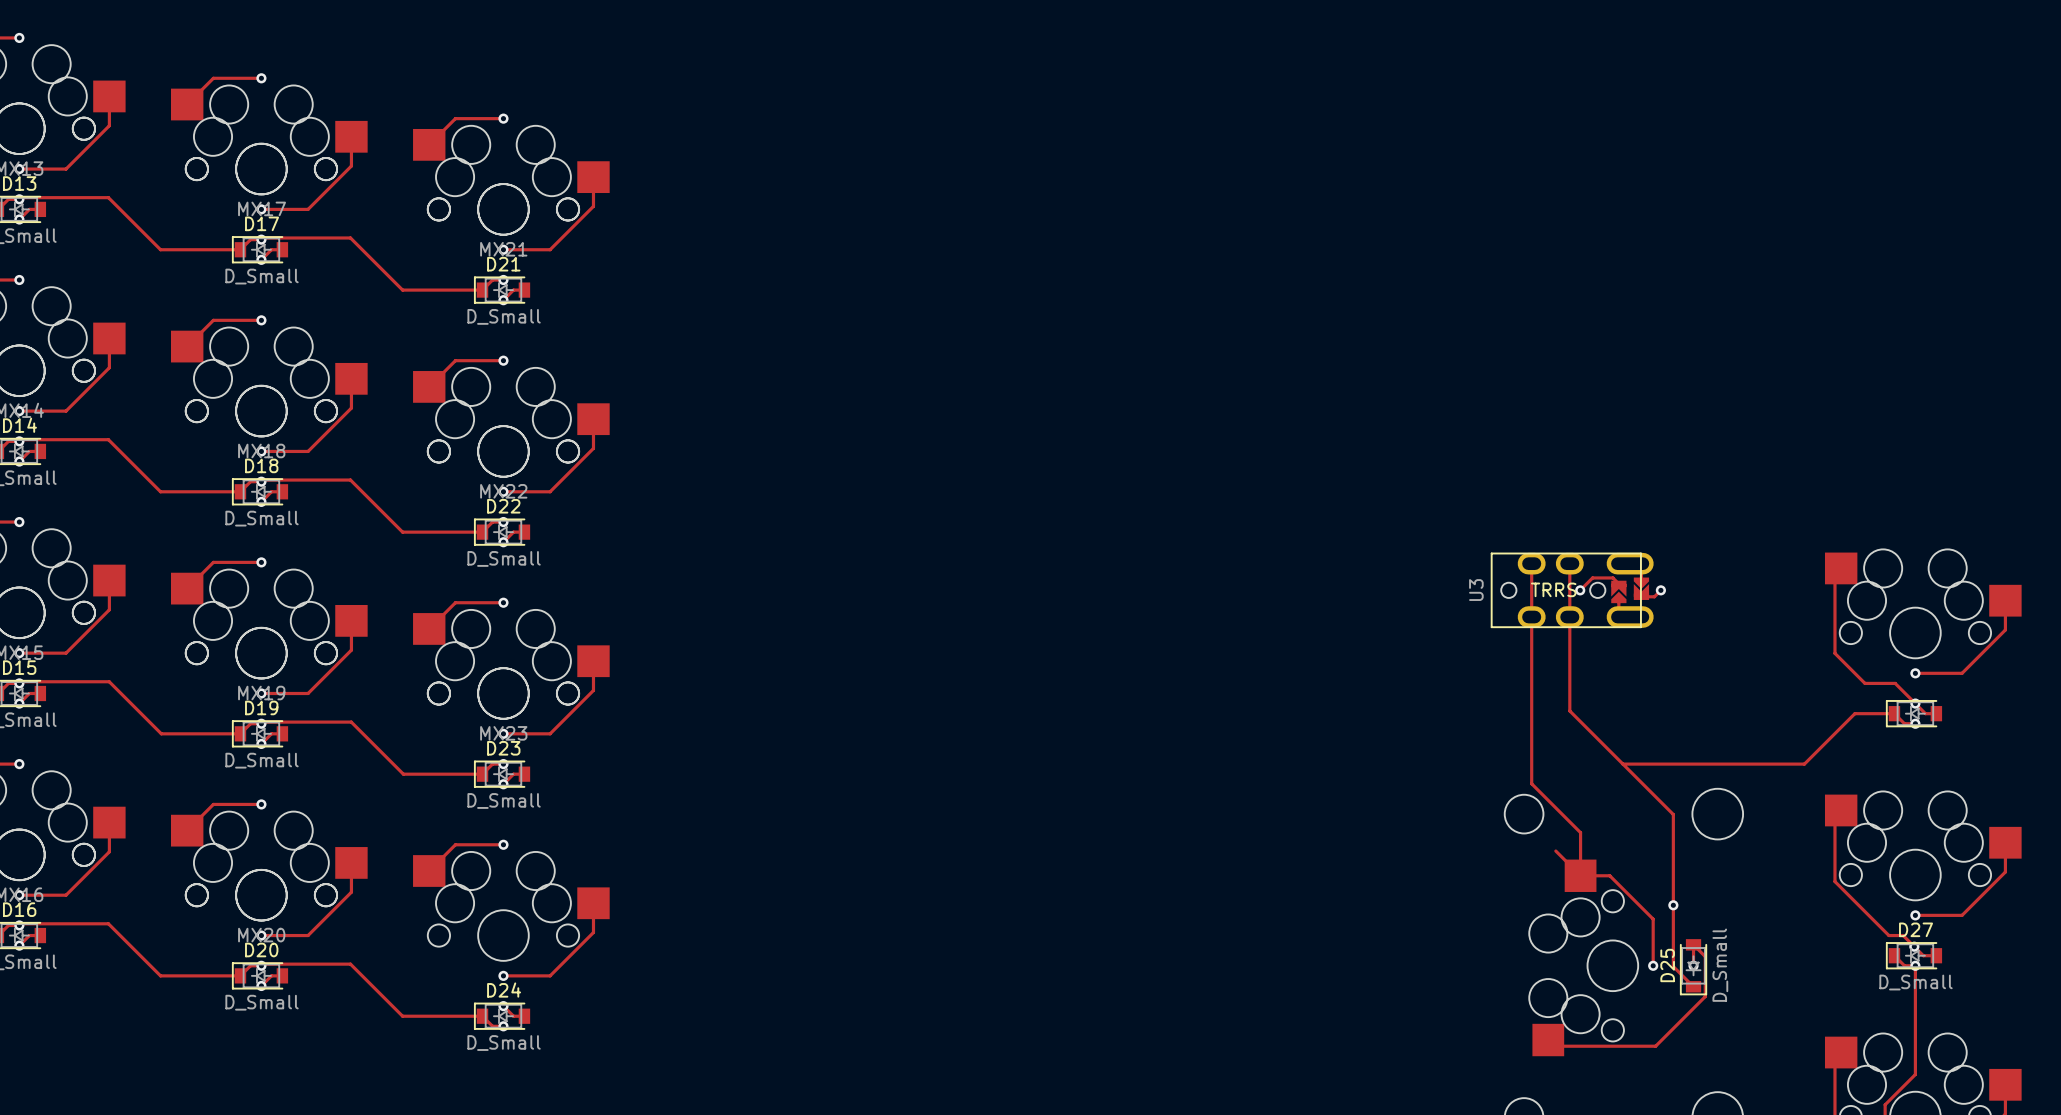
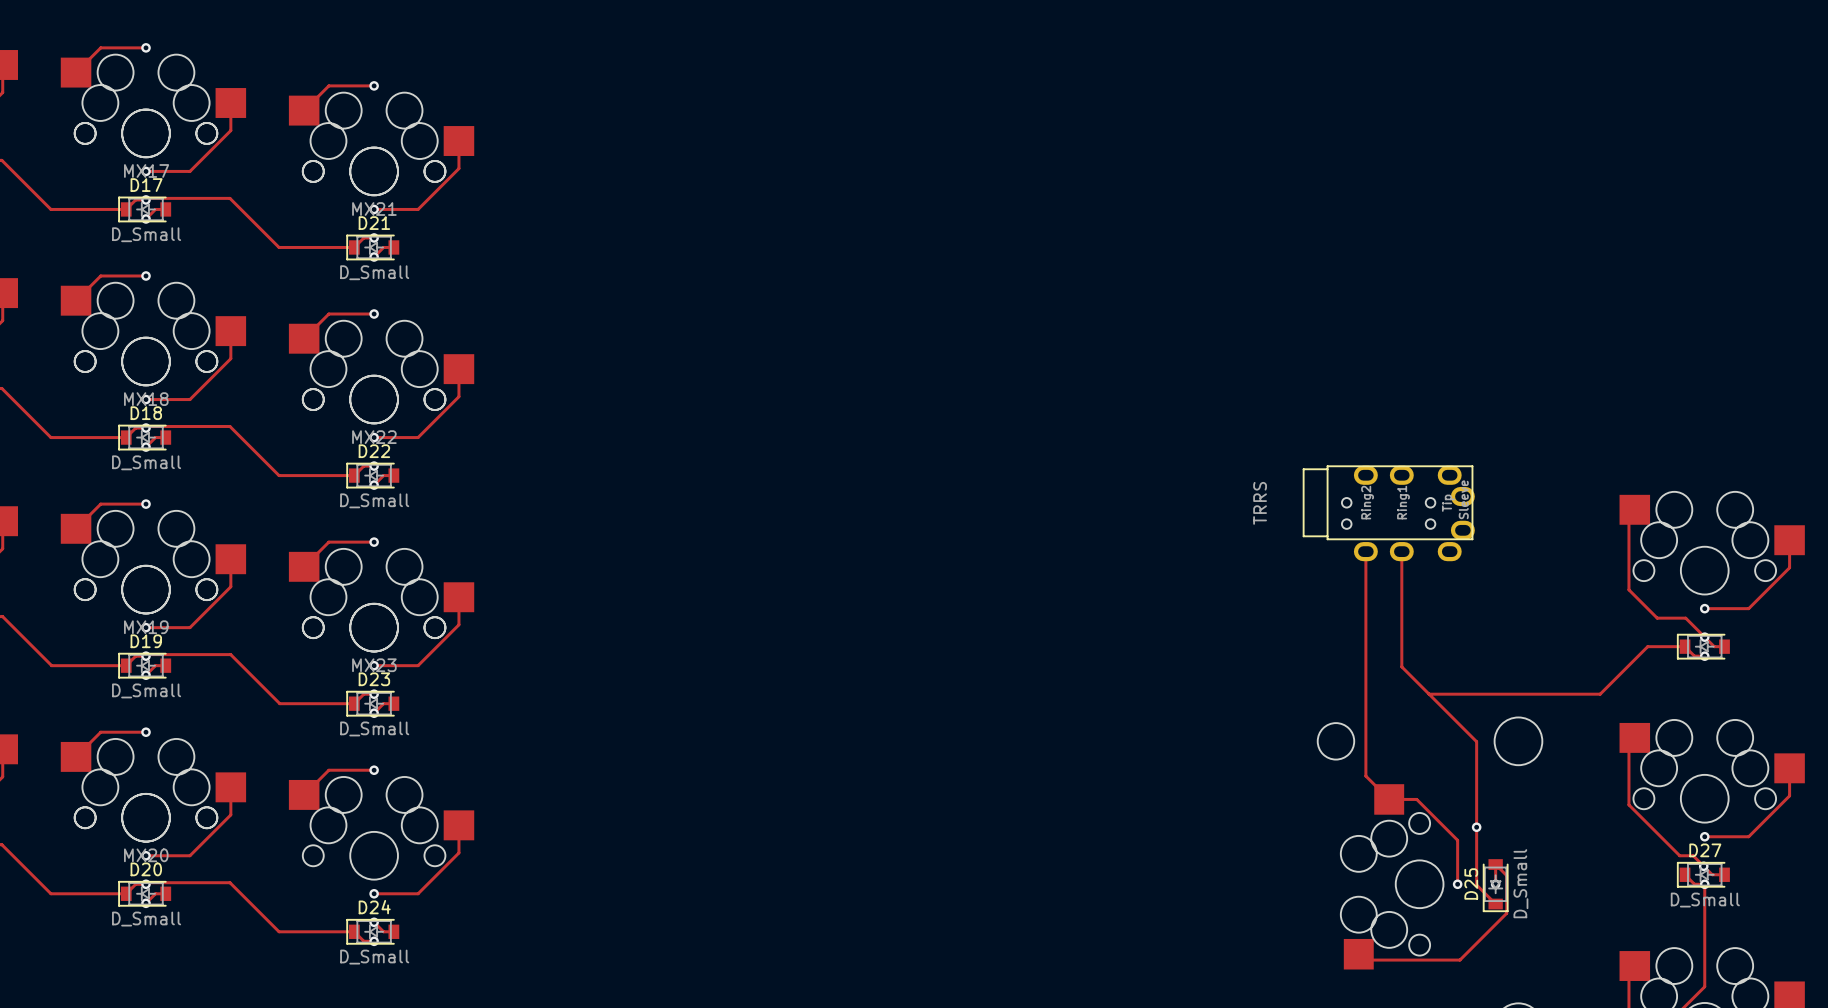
track: (1531, 563) (1531, 783) (1580, 832) (1580, 875) -> none
track: (1569, 563) (1569, 710) (1593, 735) -> (1401, 551) (1401, 666)
part: none -> TRRS (1388, 513)
track: (1618, 583) (1612, 577) (1592, 577) (1580, 590) -> none
U3: (1572, 590) -> none
via: (1580, 590) -> none
track: (1660, 590) (1654, 596) (1641, 596) -> none
via: (1660, 590) -> none
track: none -> (1365, 551) (1365, 776)

